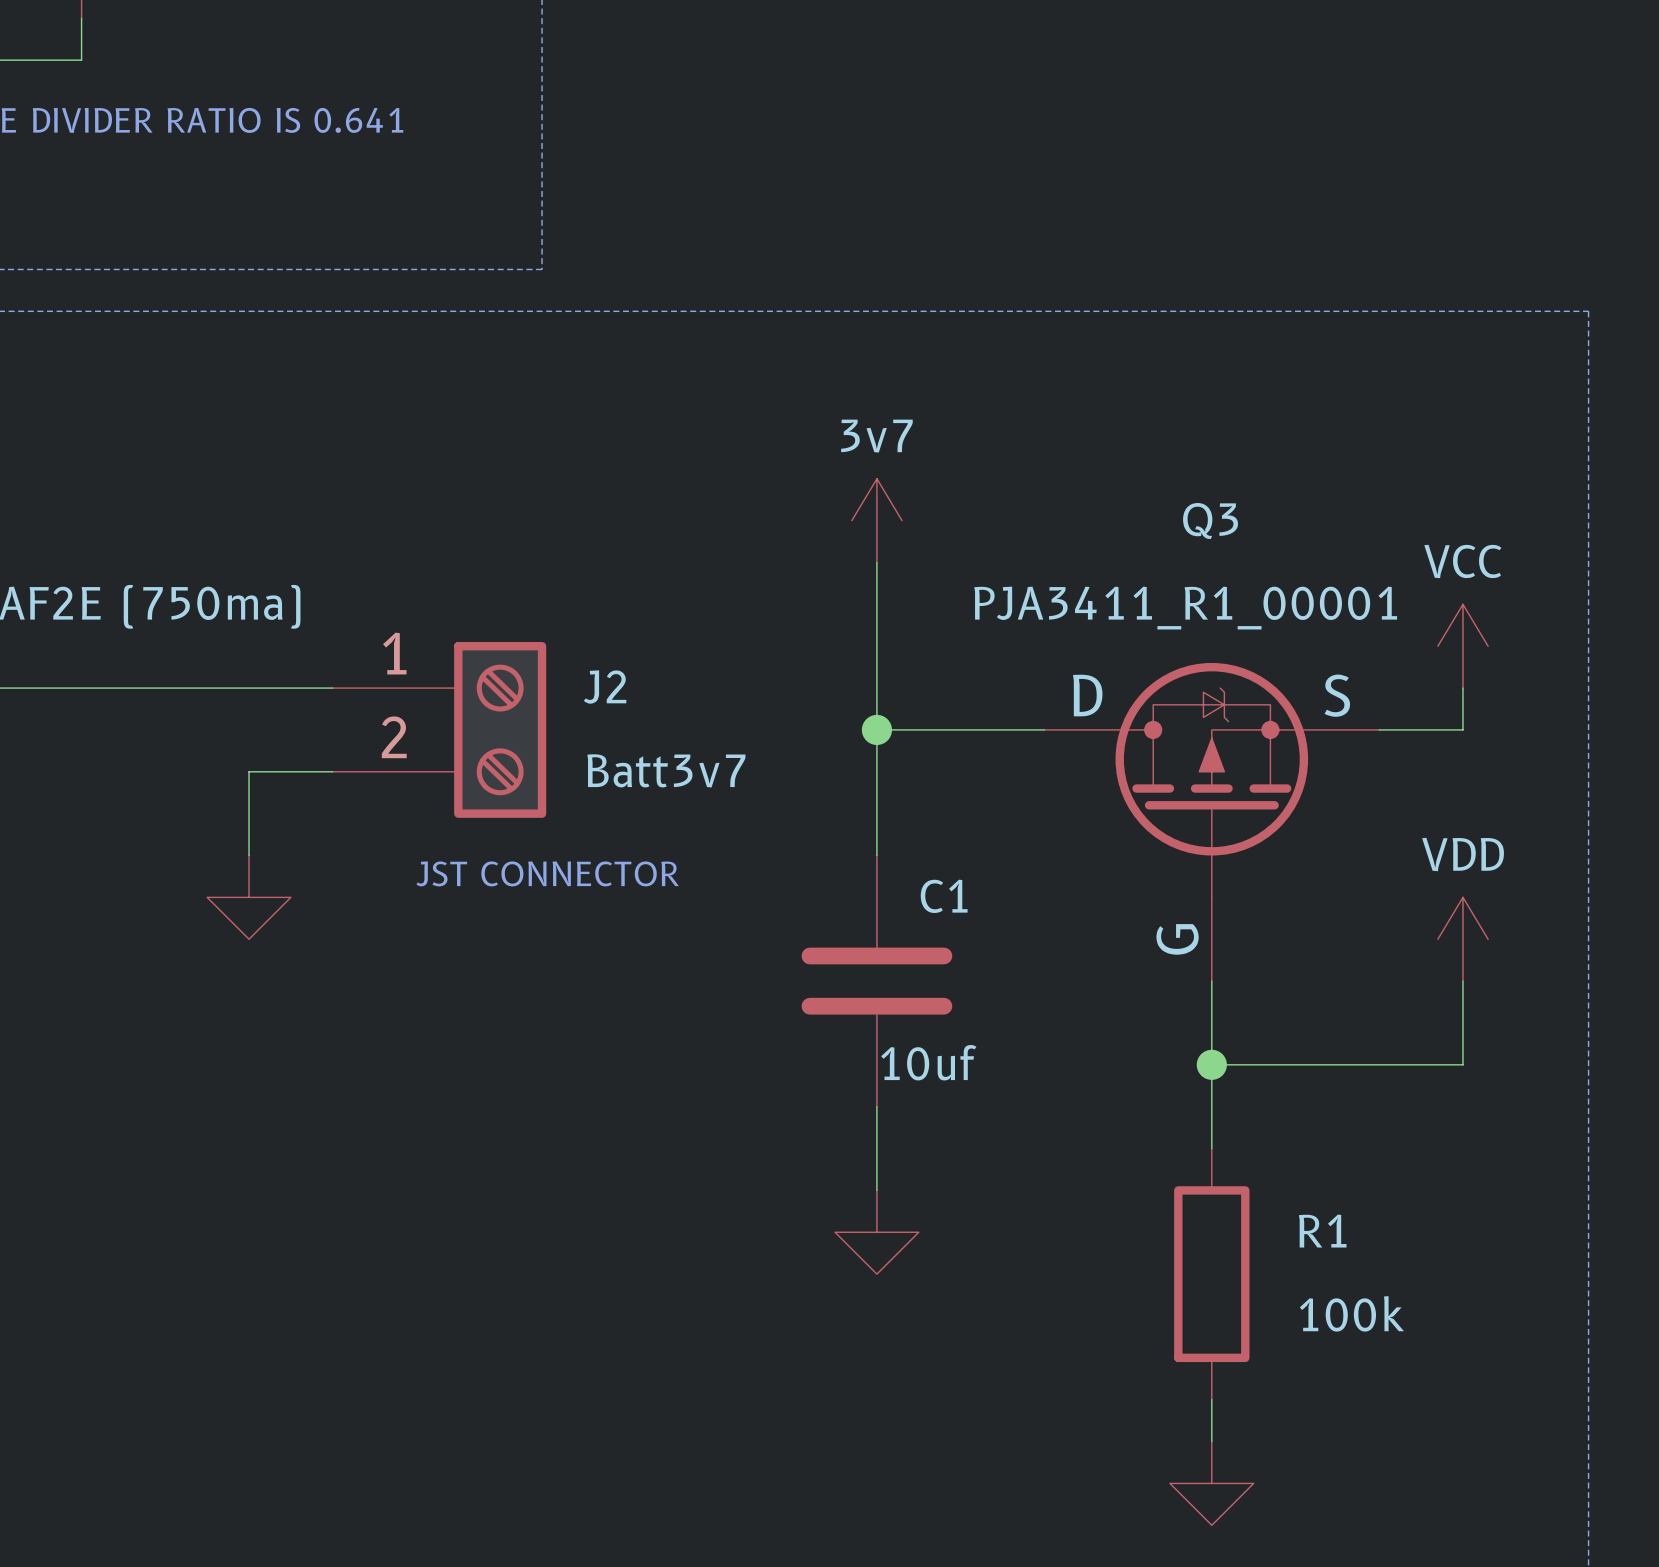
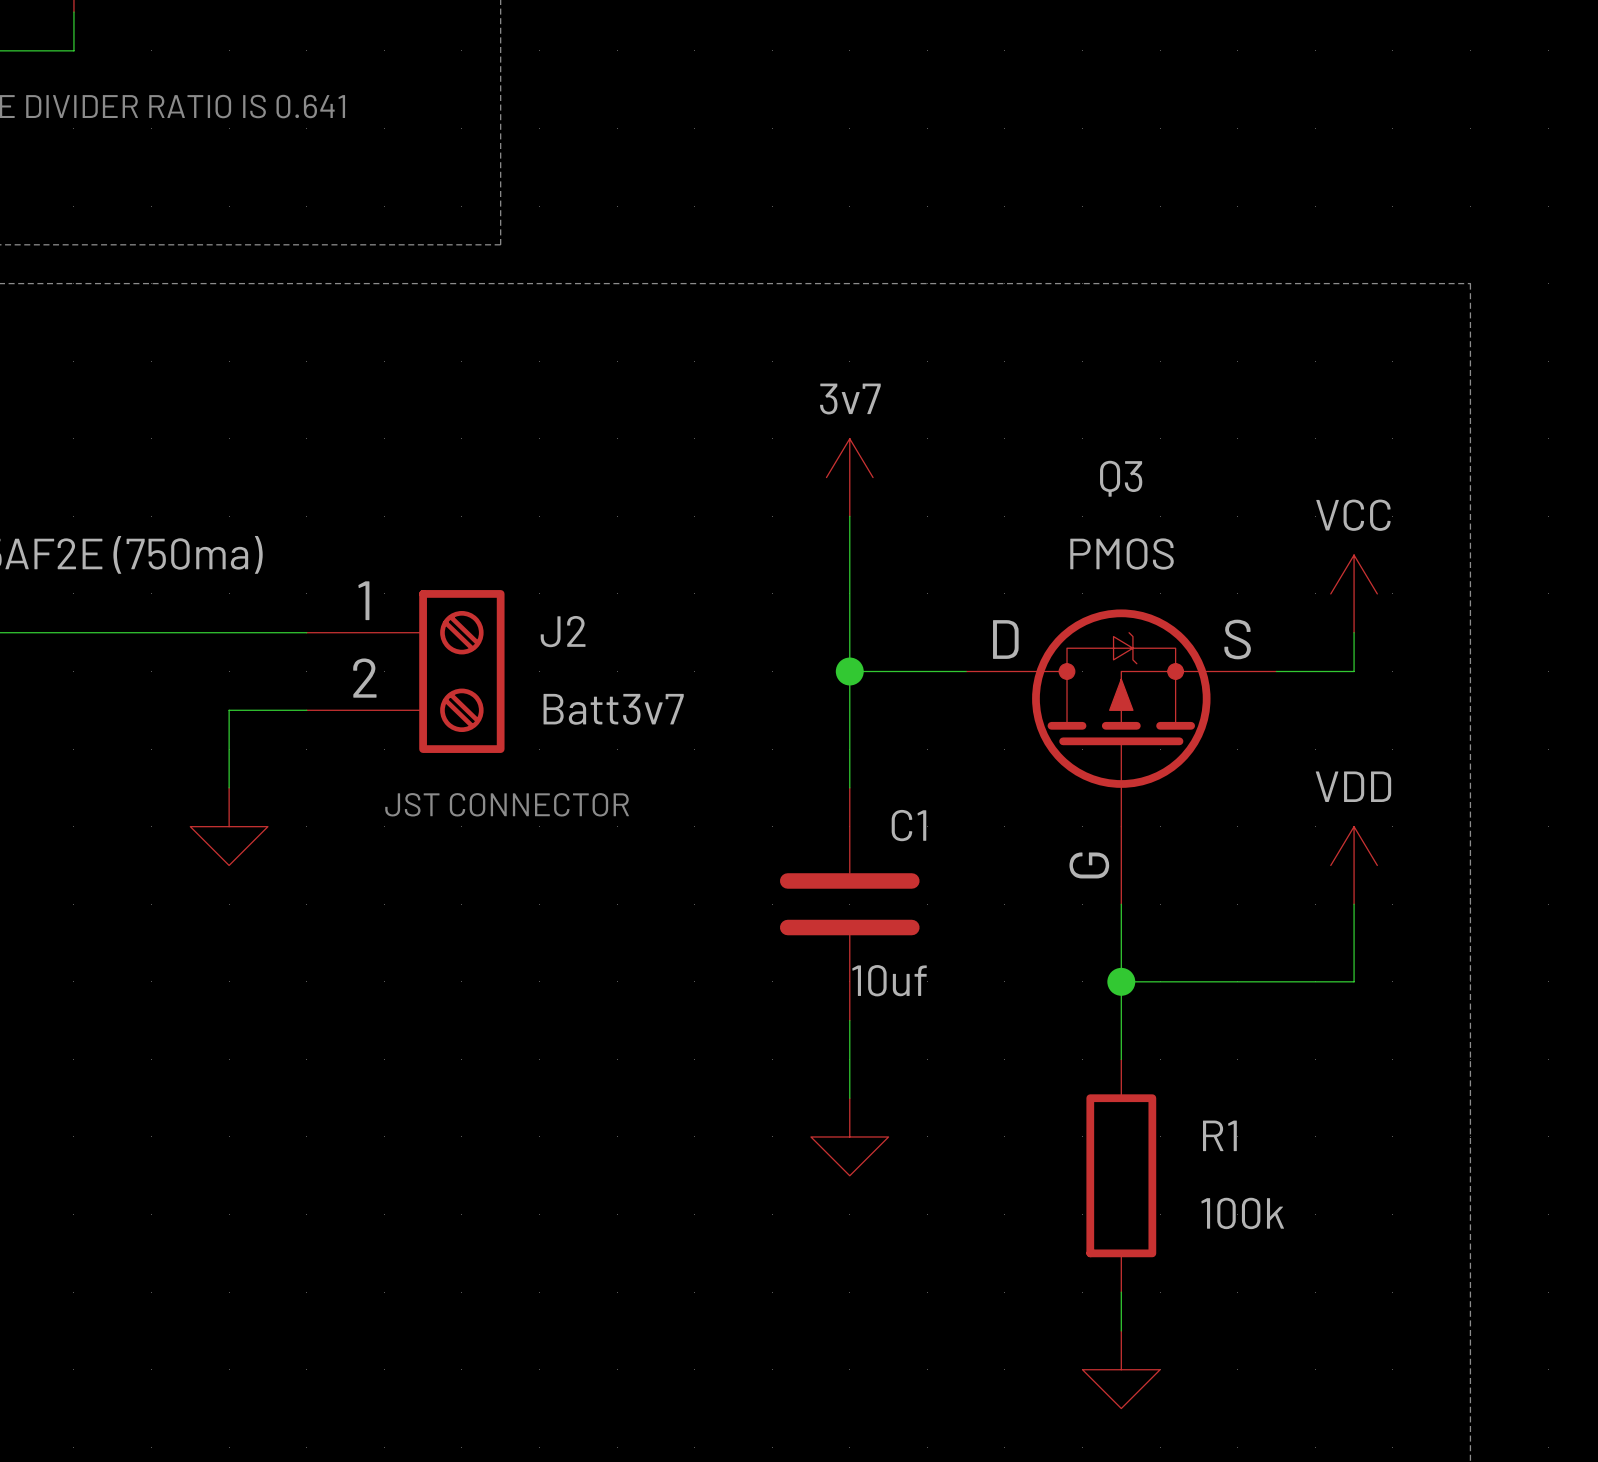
power symbol position: 3v7 (876, 520) -> 3v7 (849, 477)
wire: (876, 562) (876, 855) -> (849, 516) (849, 787)
Q3 value: PJA3411_R1_00001 (1185, 608) -> PMOS (1122, 553)
wire: (876, 729) (918, 729) -> none
junction position: (876, 729) -> (849, 671)
C1 position: (876, 981) -> (849, 904)
wire: (876, 1106) (876, 1190) -> (849, 1020) (849, 1098)
power symbol position: (876, 1232) -> (849, 1136)

